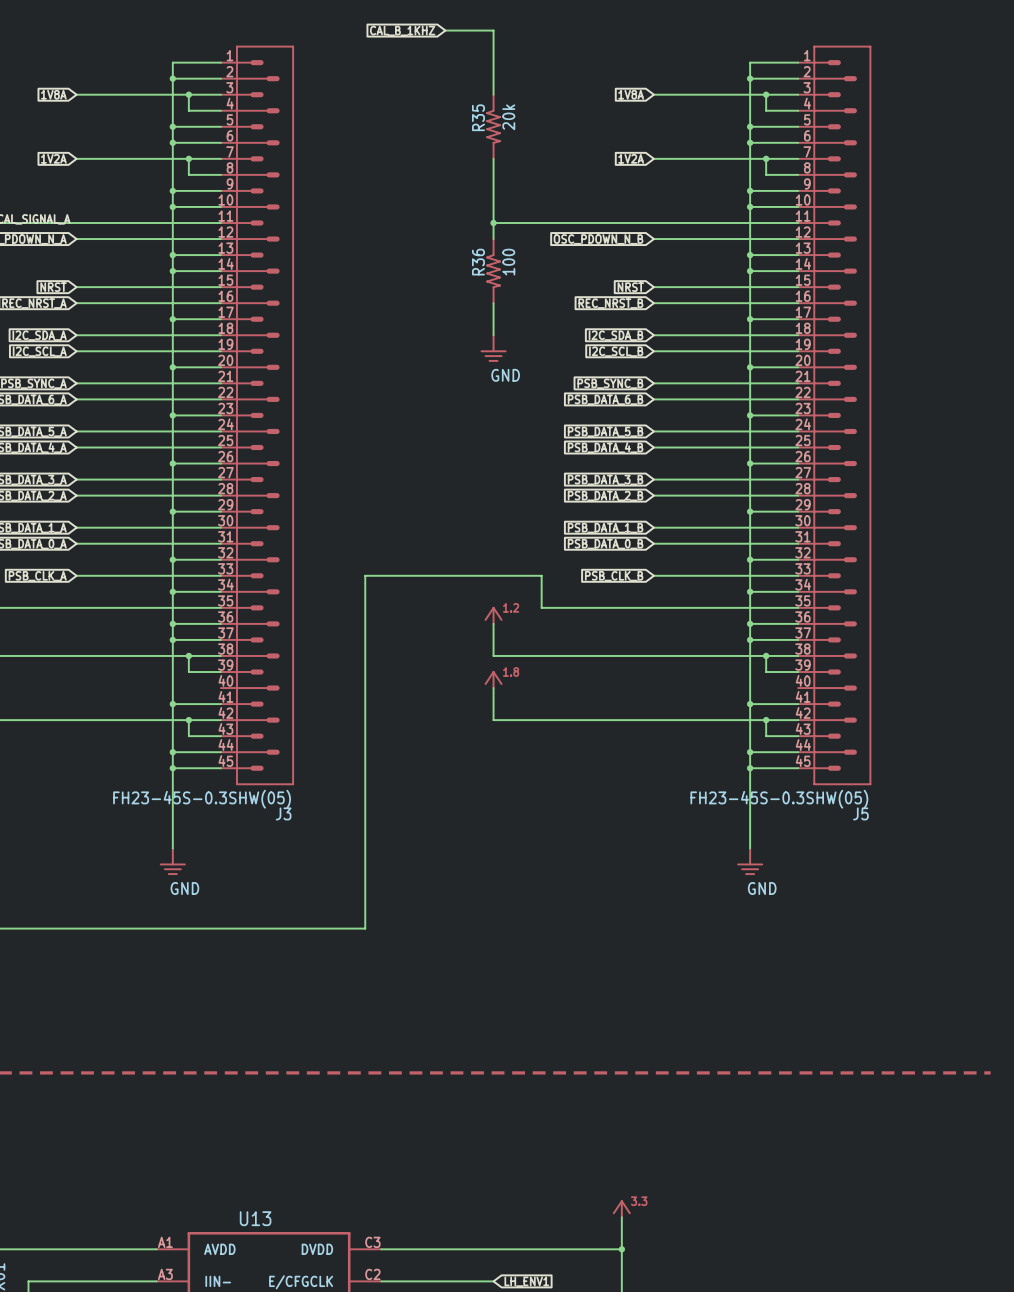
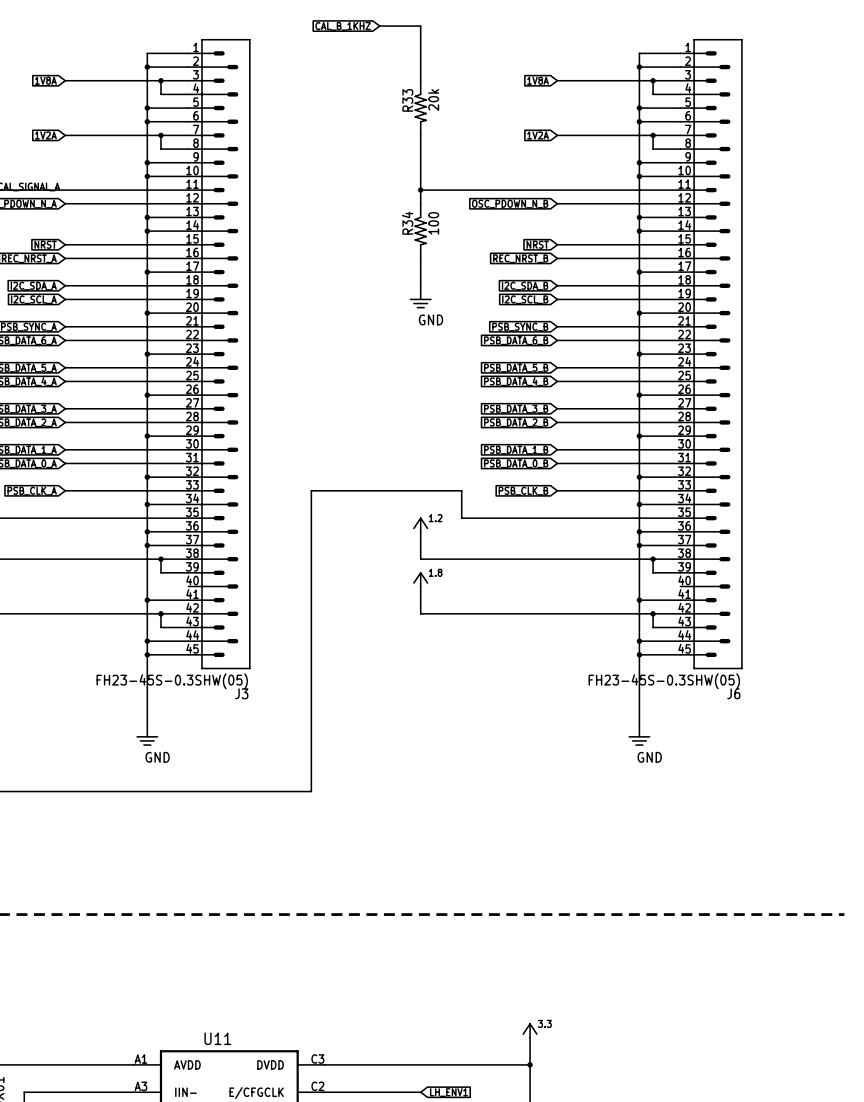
R35 name: R35 (478, 117) -> R33 (407, 100)
R36 name: R36 (478, 262) -> R34 (407, 223)
J5 name: J5 (860, 813) -> J6 (733, 693)
U13 name: U13 (255, 1218) -> U11 (217, 1038)

